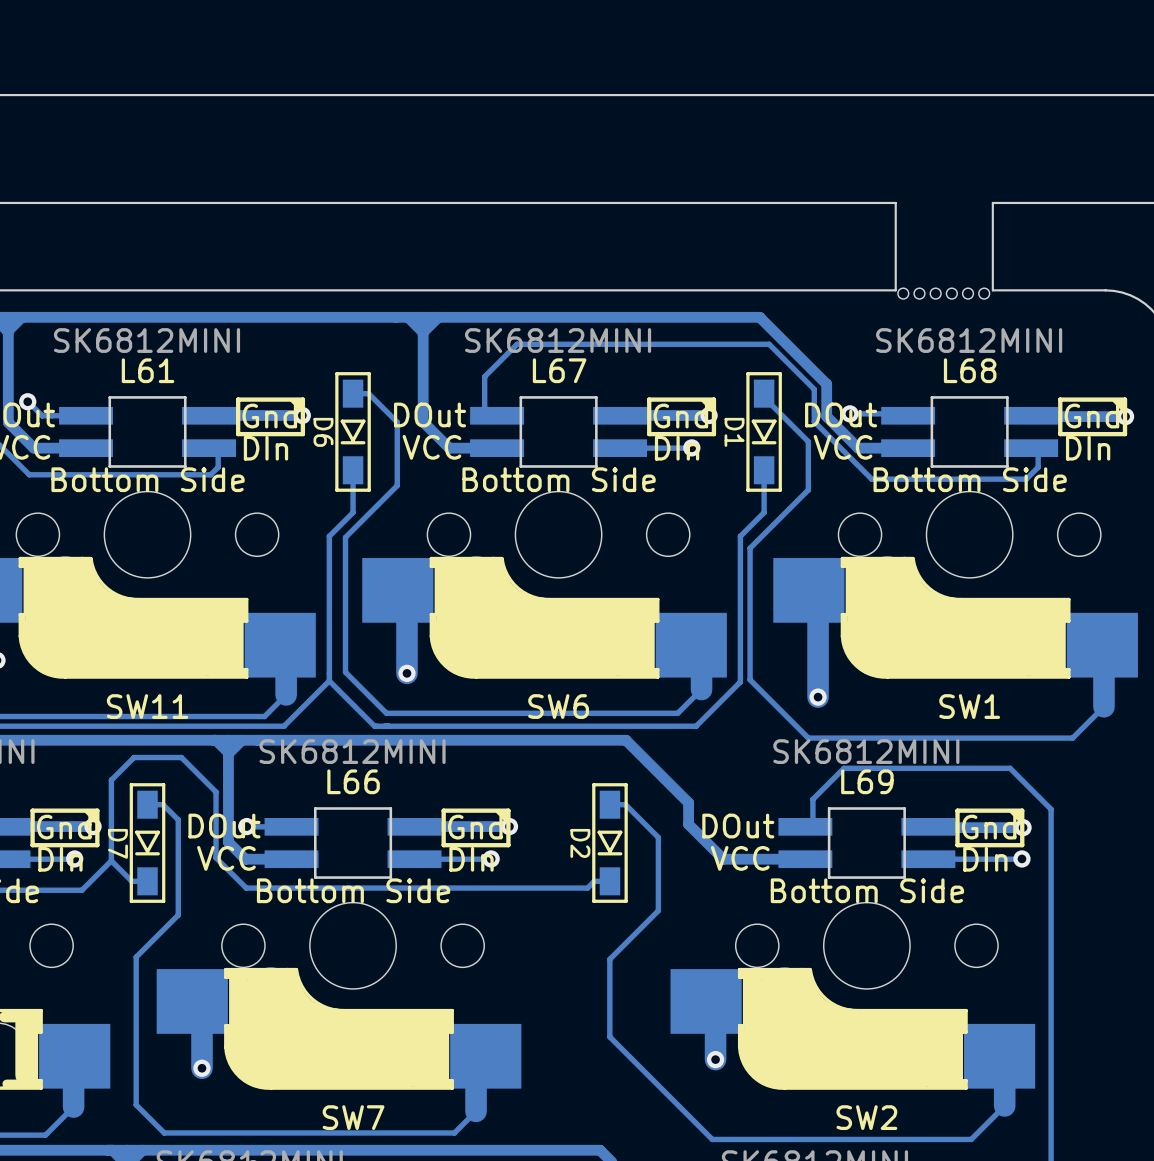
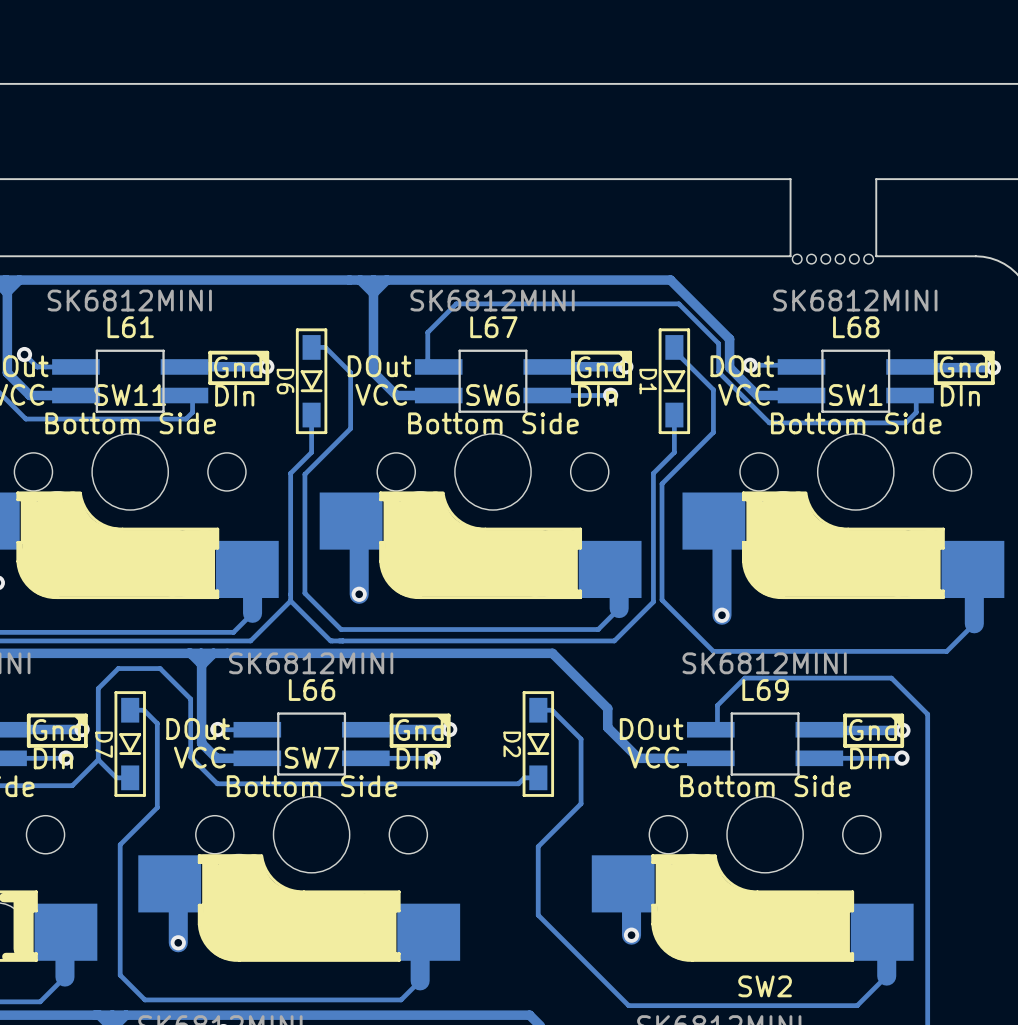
SW11 name position: SW11 (147, 706) -> SW11 (130, 395)
SW6 name position: SW6 (558, 706) -> SW6 (492, 395)
SW1 name position: SW1 (969, 706) -> SW1 (855, 395)
SW7 name position: SW7 (353, 1117) -> SW7 (312, 757)

